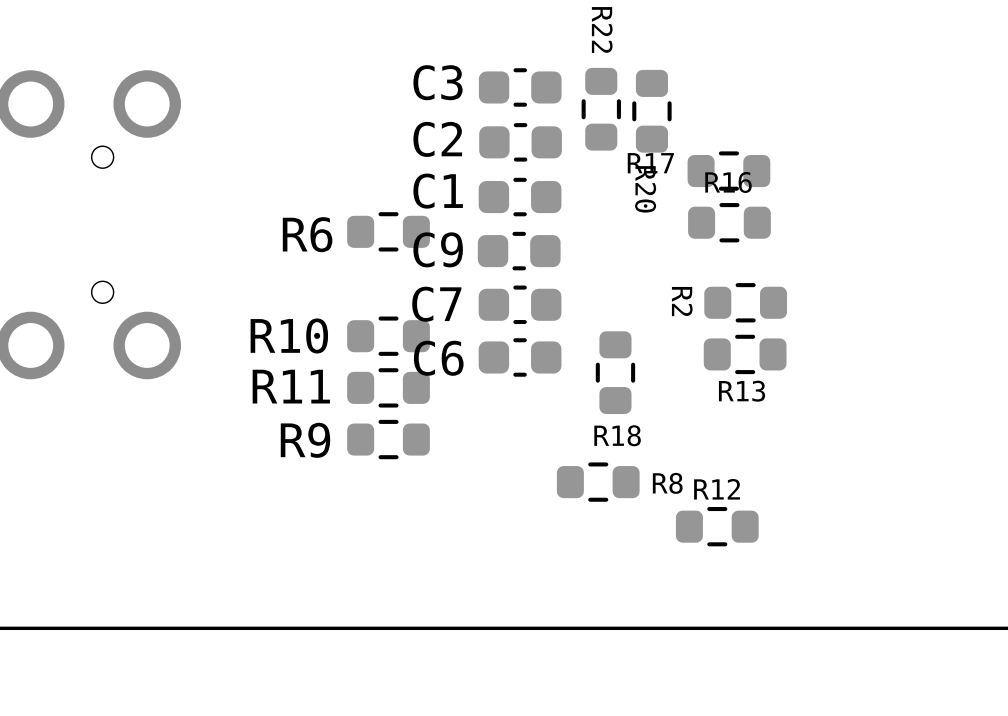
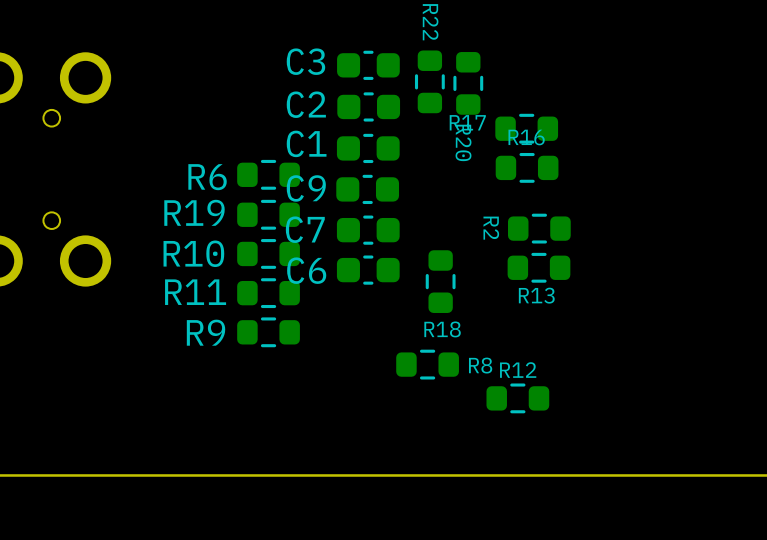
R19: none -> (268, 214)

